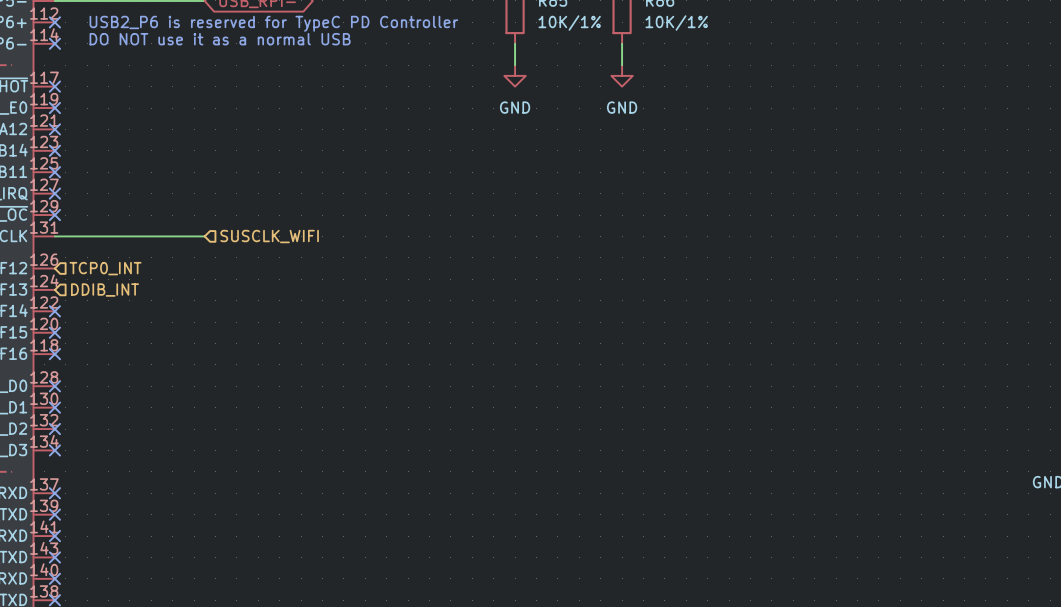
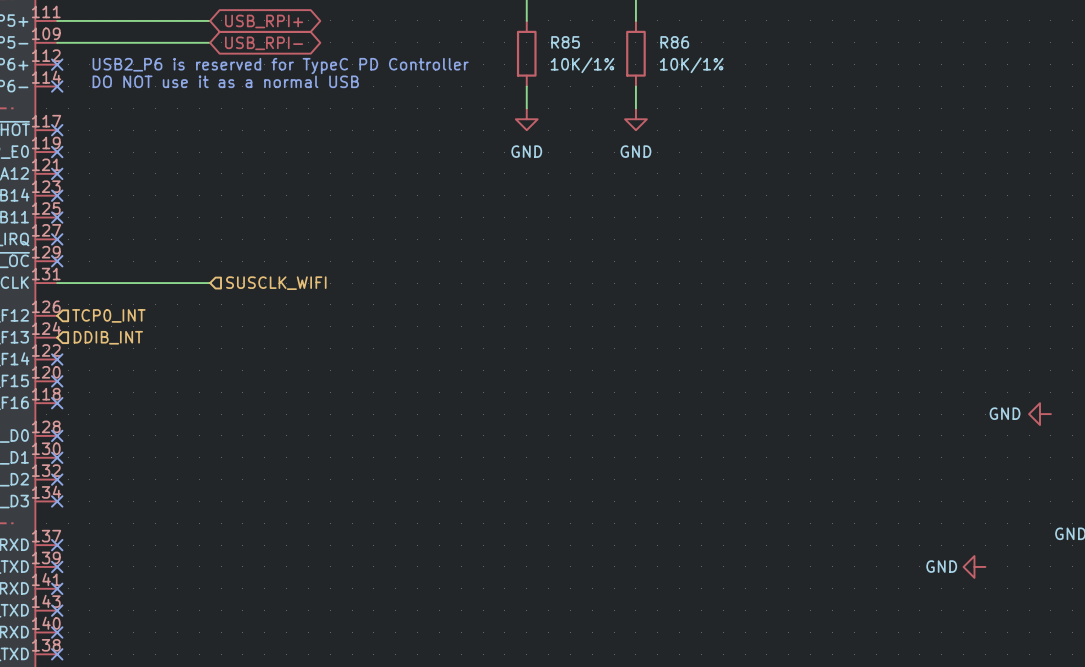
power symbol: none -> GND (1039, 414)
power symbol: none -> GND (974, 566)

